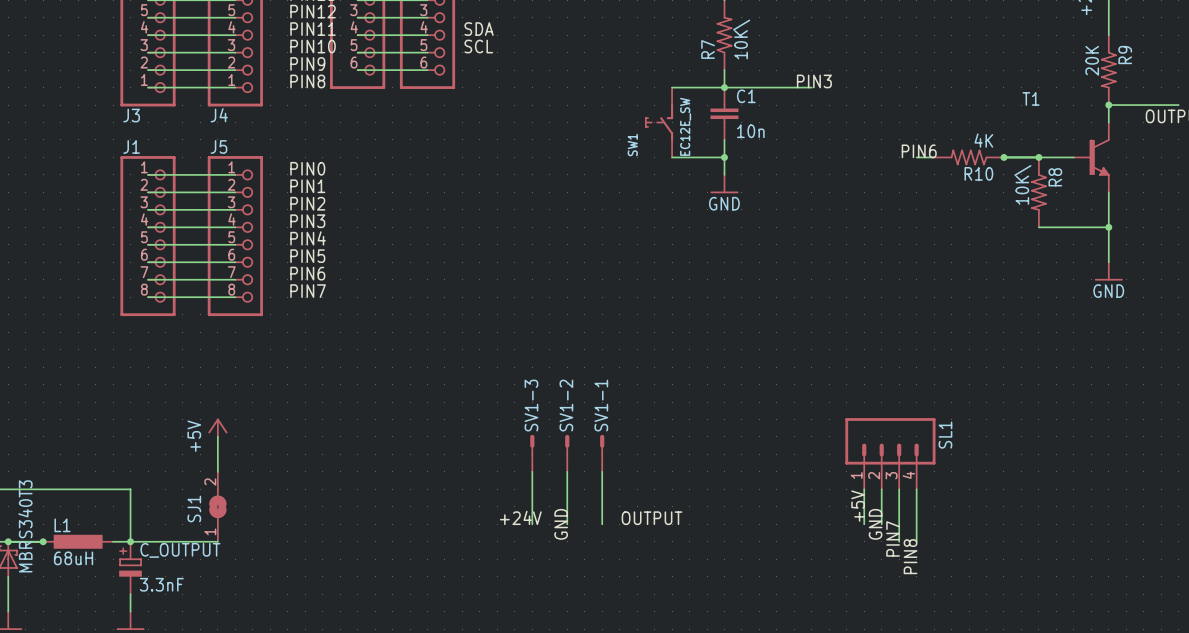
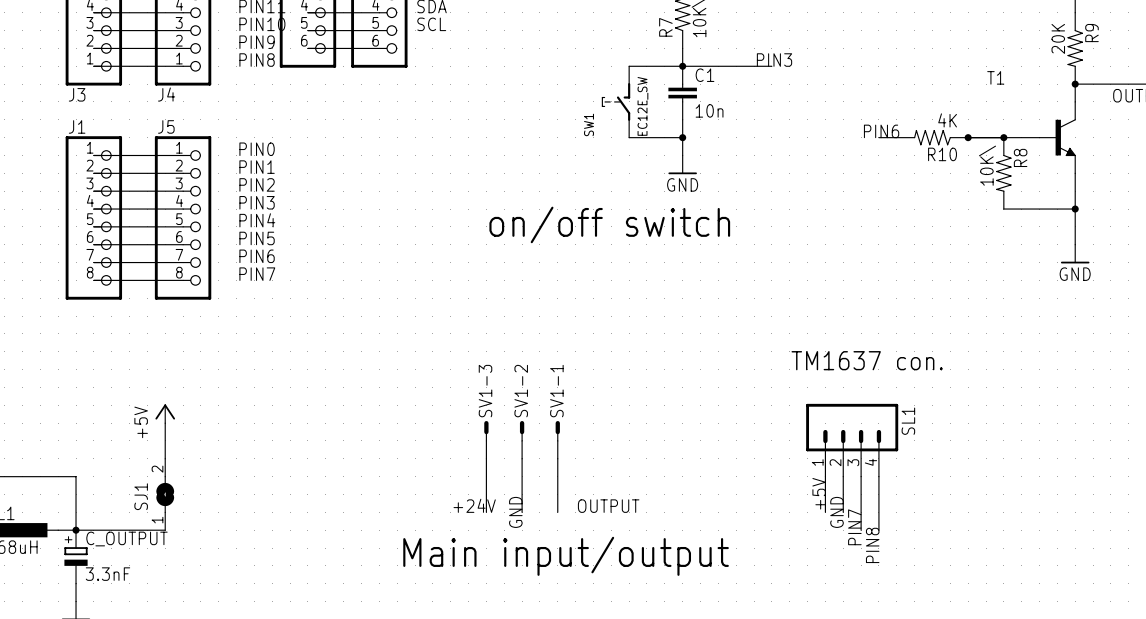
text: none -> on/off switch (609, 224)
text: none -> TM1637 con. (867, 360)
text: none -> Main input/output (566, 556)

